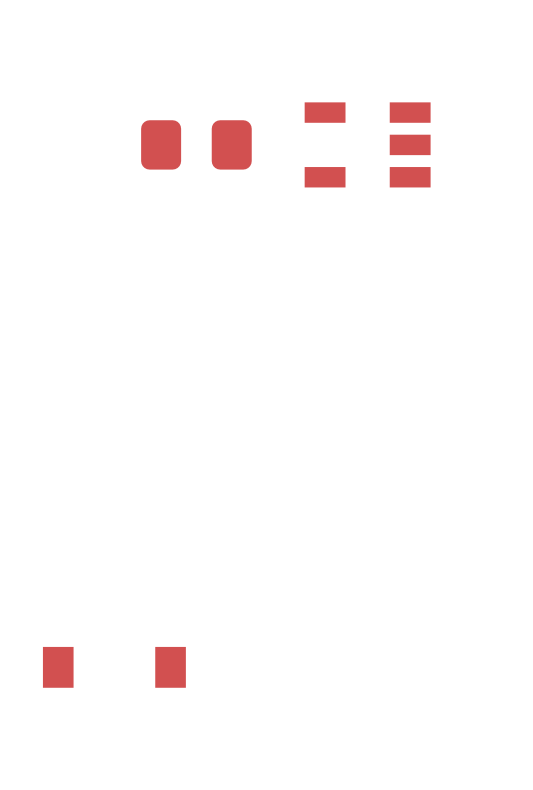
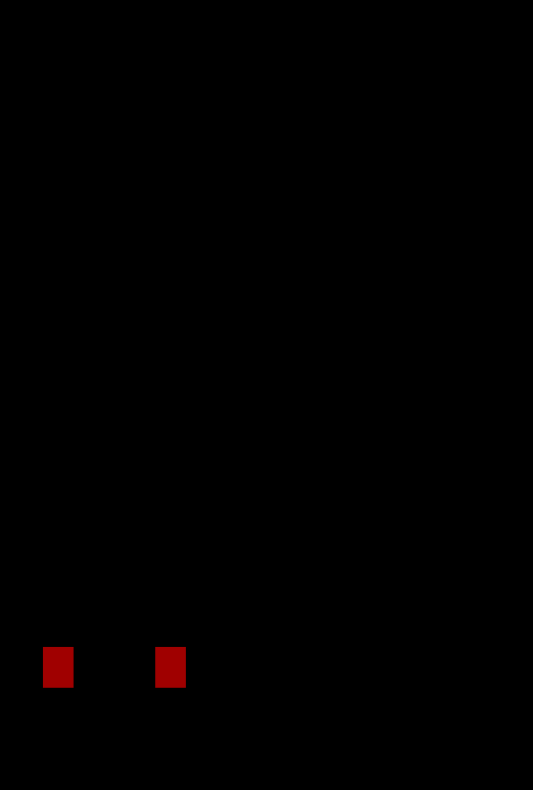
part: (196, 144) -> none
part: (367, 144) -> none

